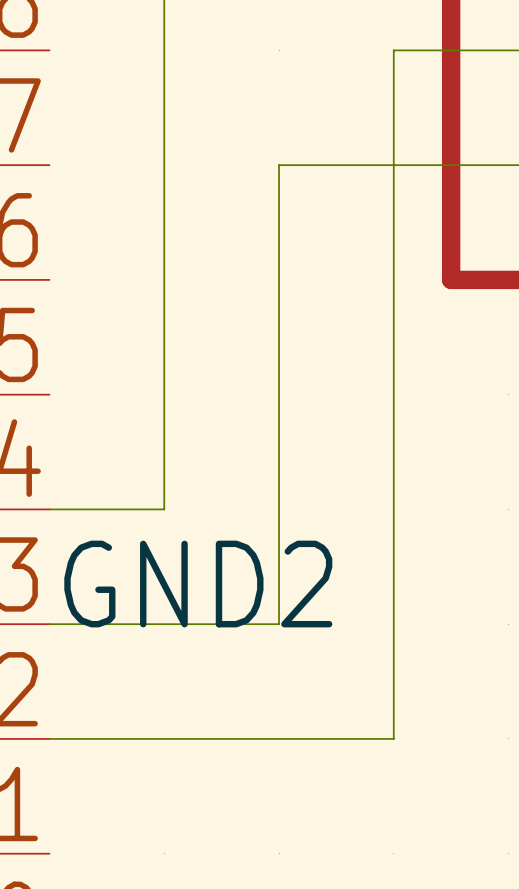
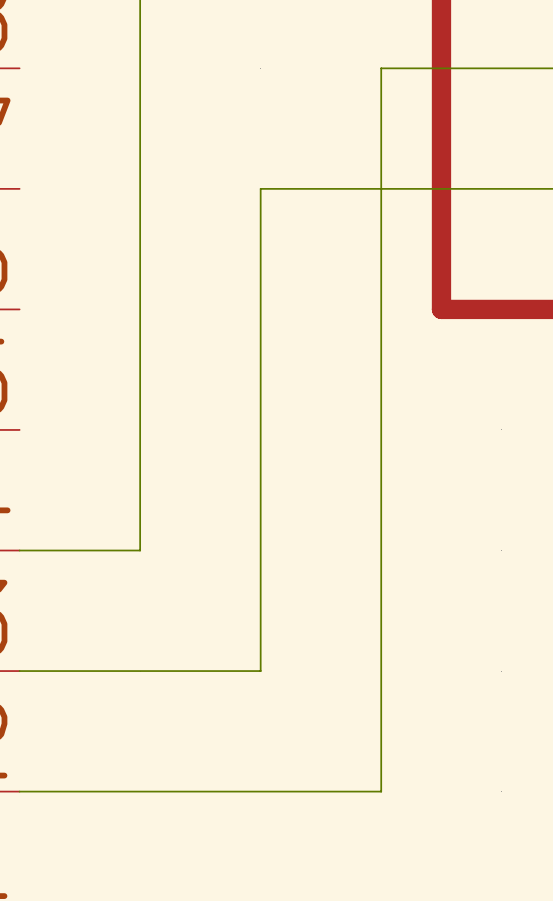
label: GND2 (198, 584) -> none

